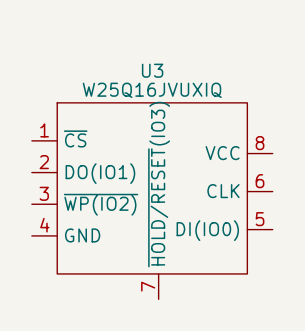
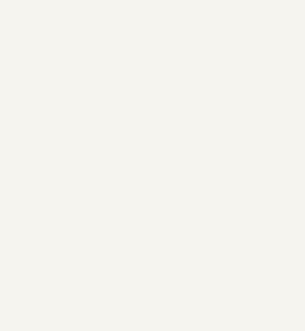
U3: W25Q16JVUXIQ (152, 201) -> none

